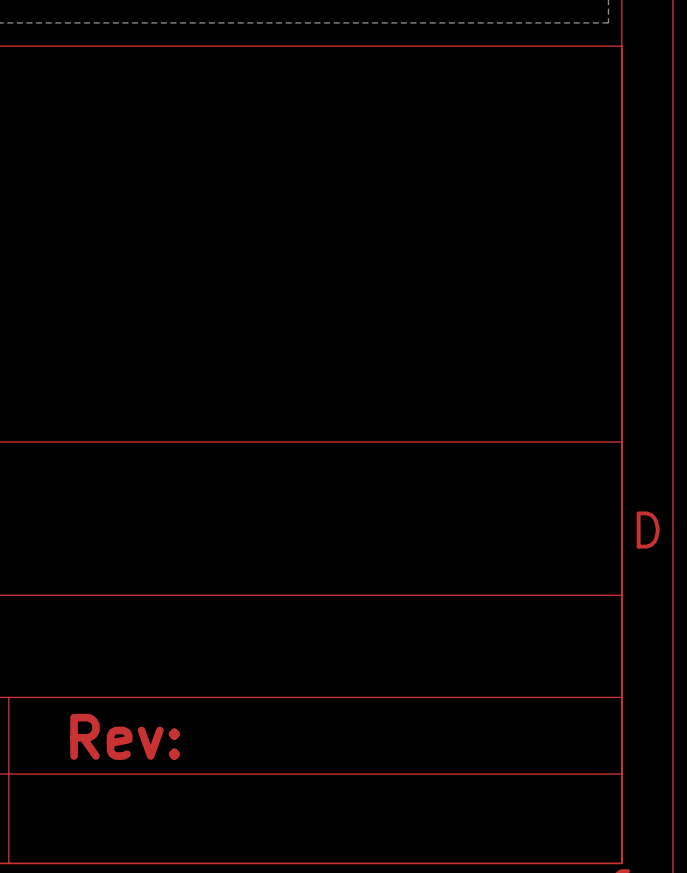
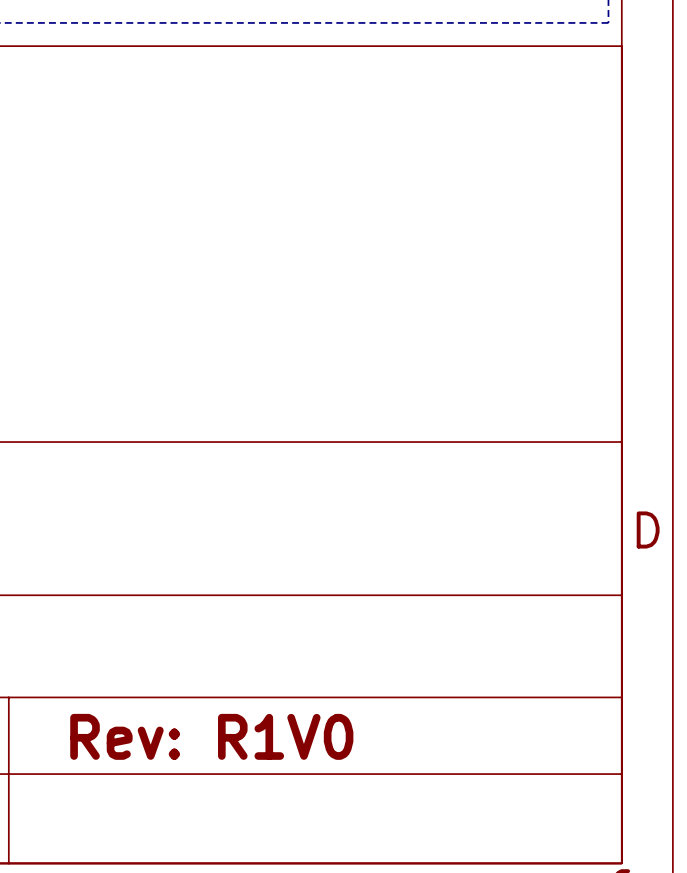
title block: Rev: (125, 736) -> Rev: R1V0 (211, 736)

